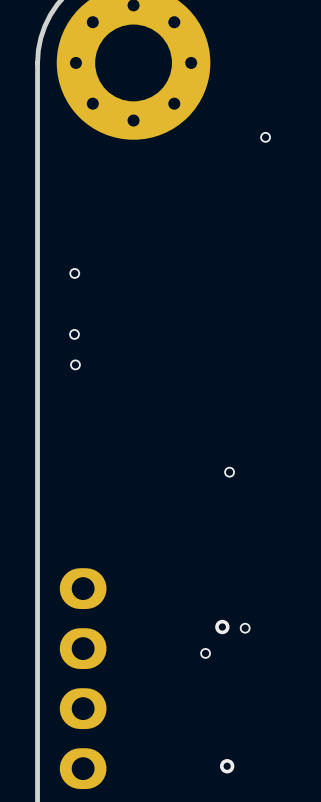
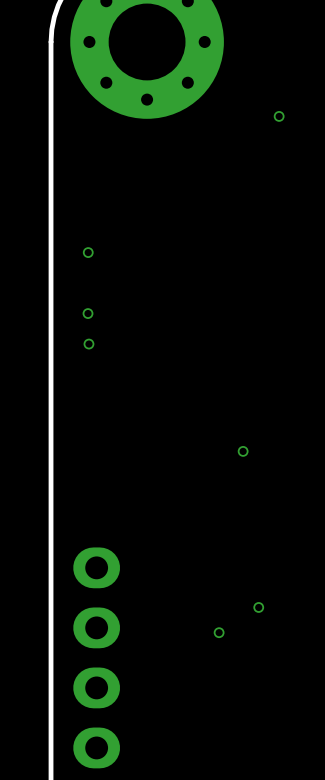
via: (222, 627) -> none
via: (227, 766) -> none

